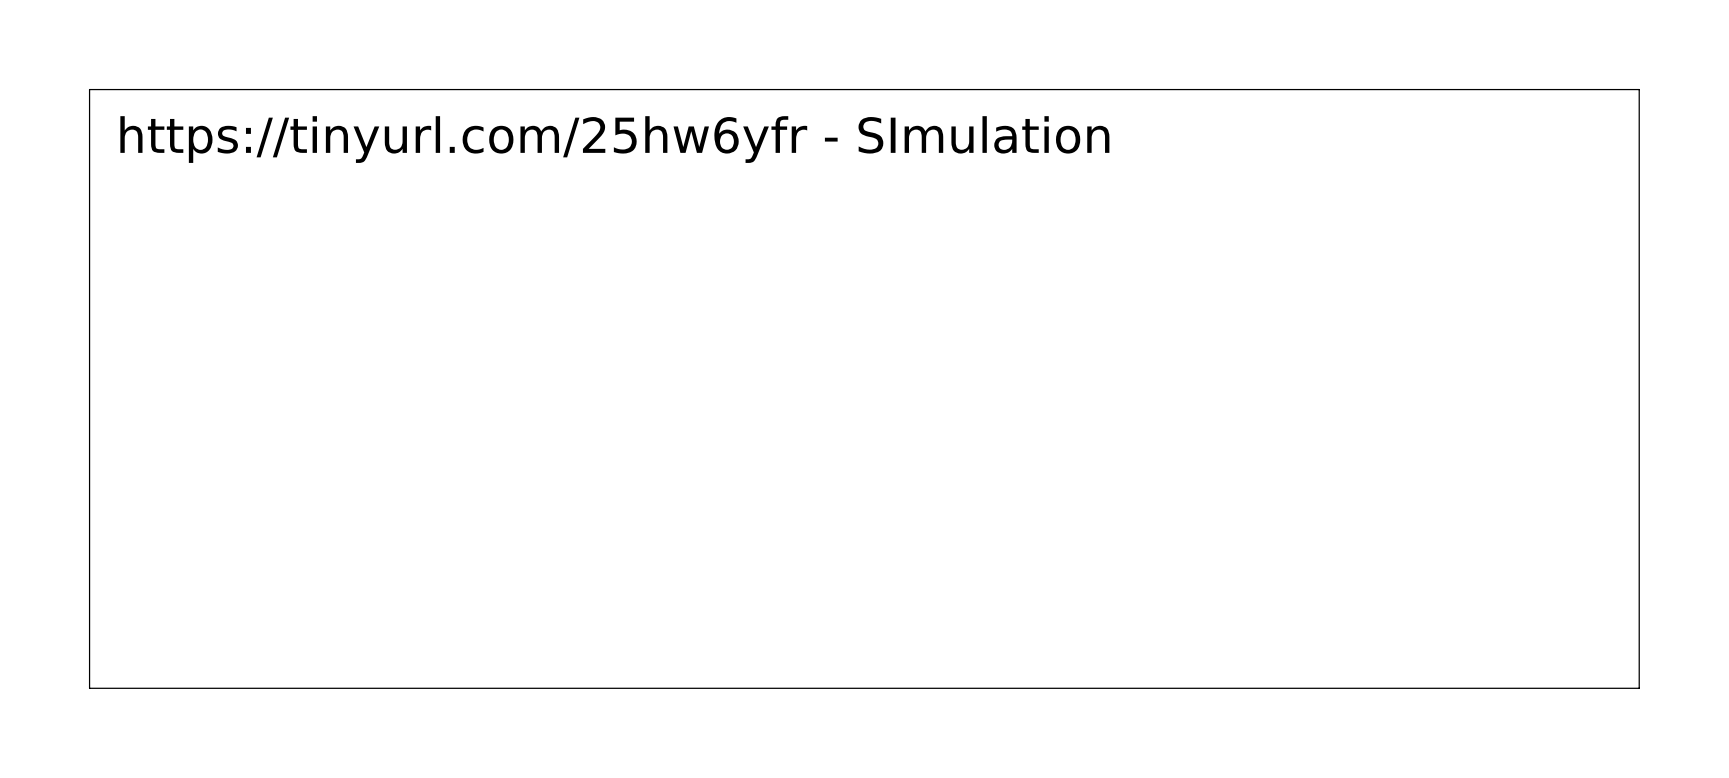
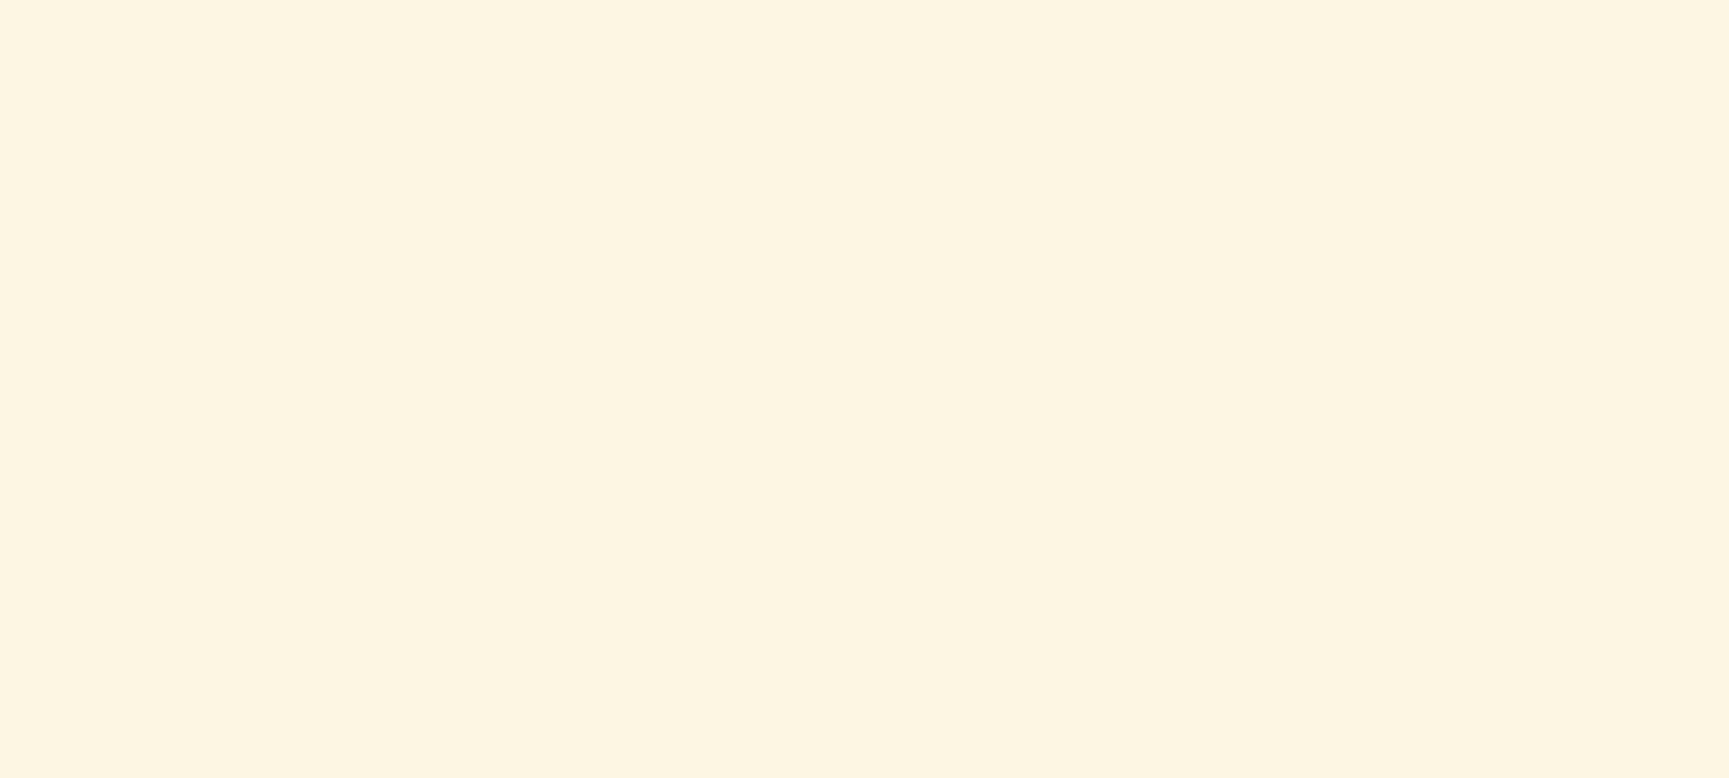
line: (89, 89) (1639, 89) (1639, 688) (89, 688) (89, 89) -> none
text: https://tinyurl.com/25hw6yfr - SImulation (614, 139) -> none

